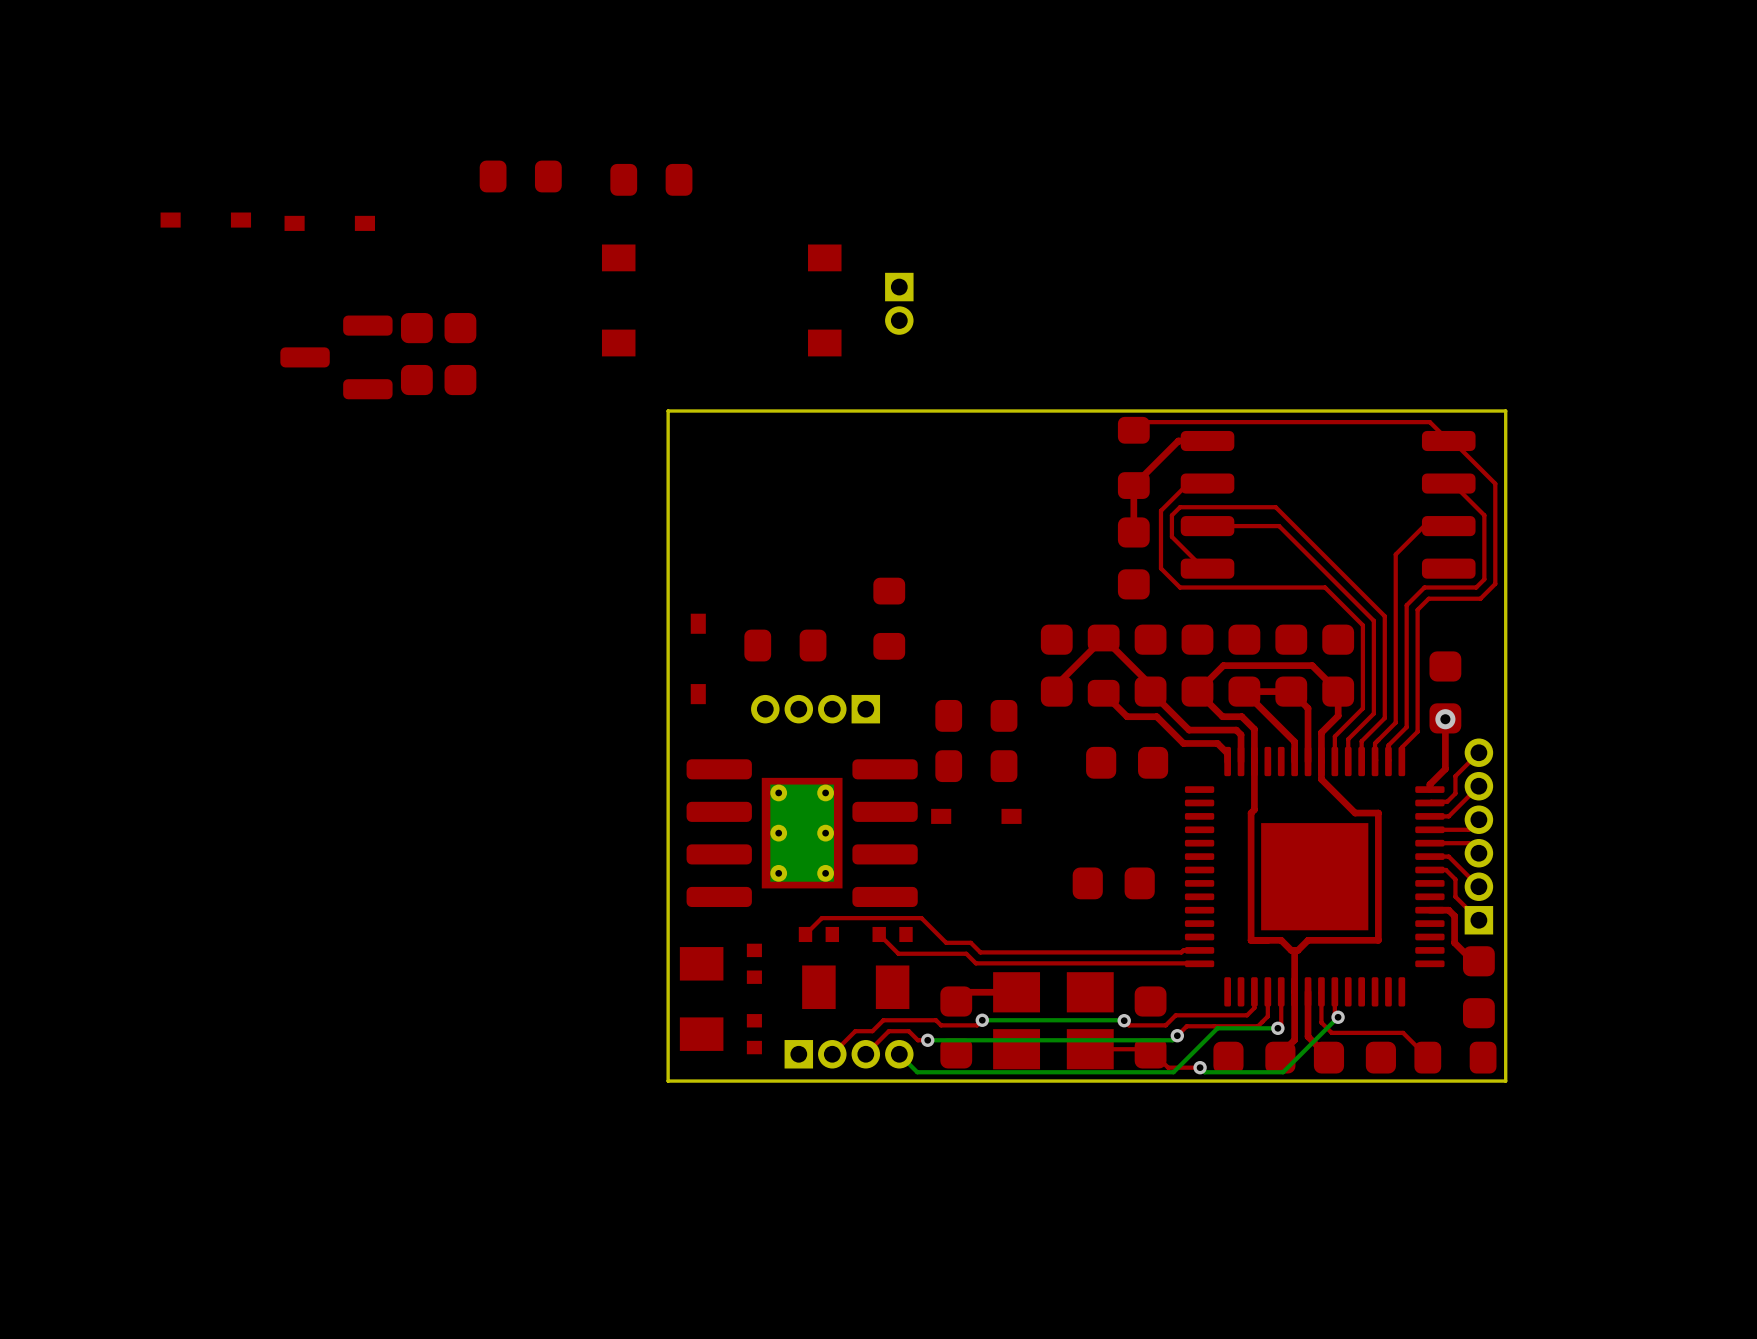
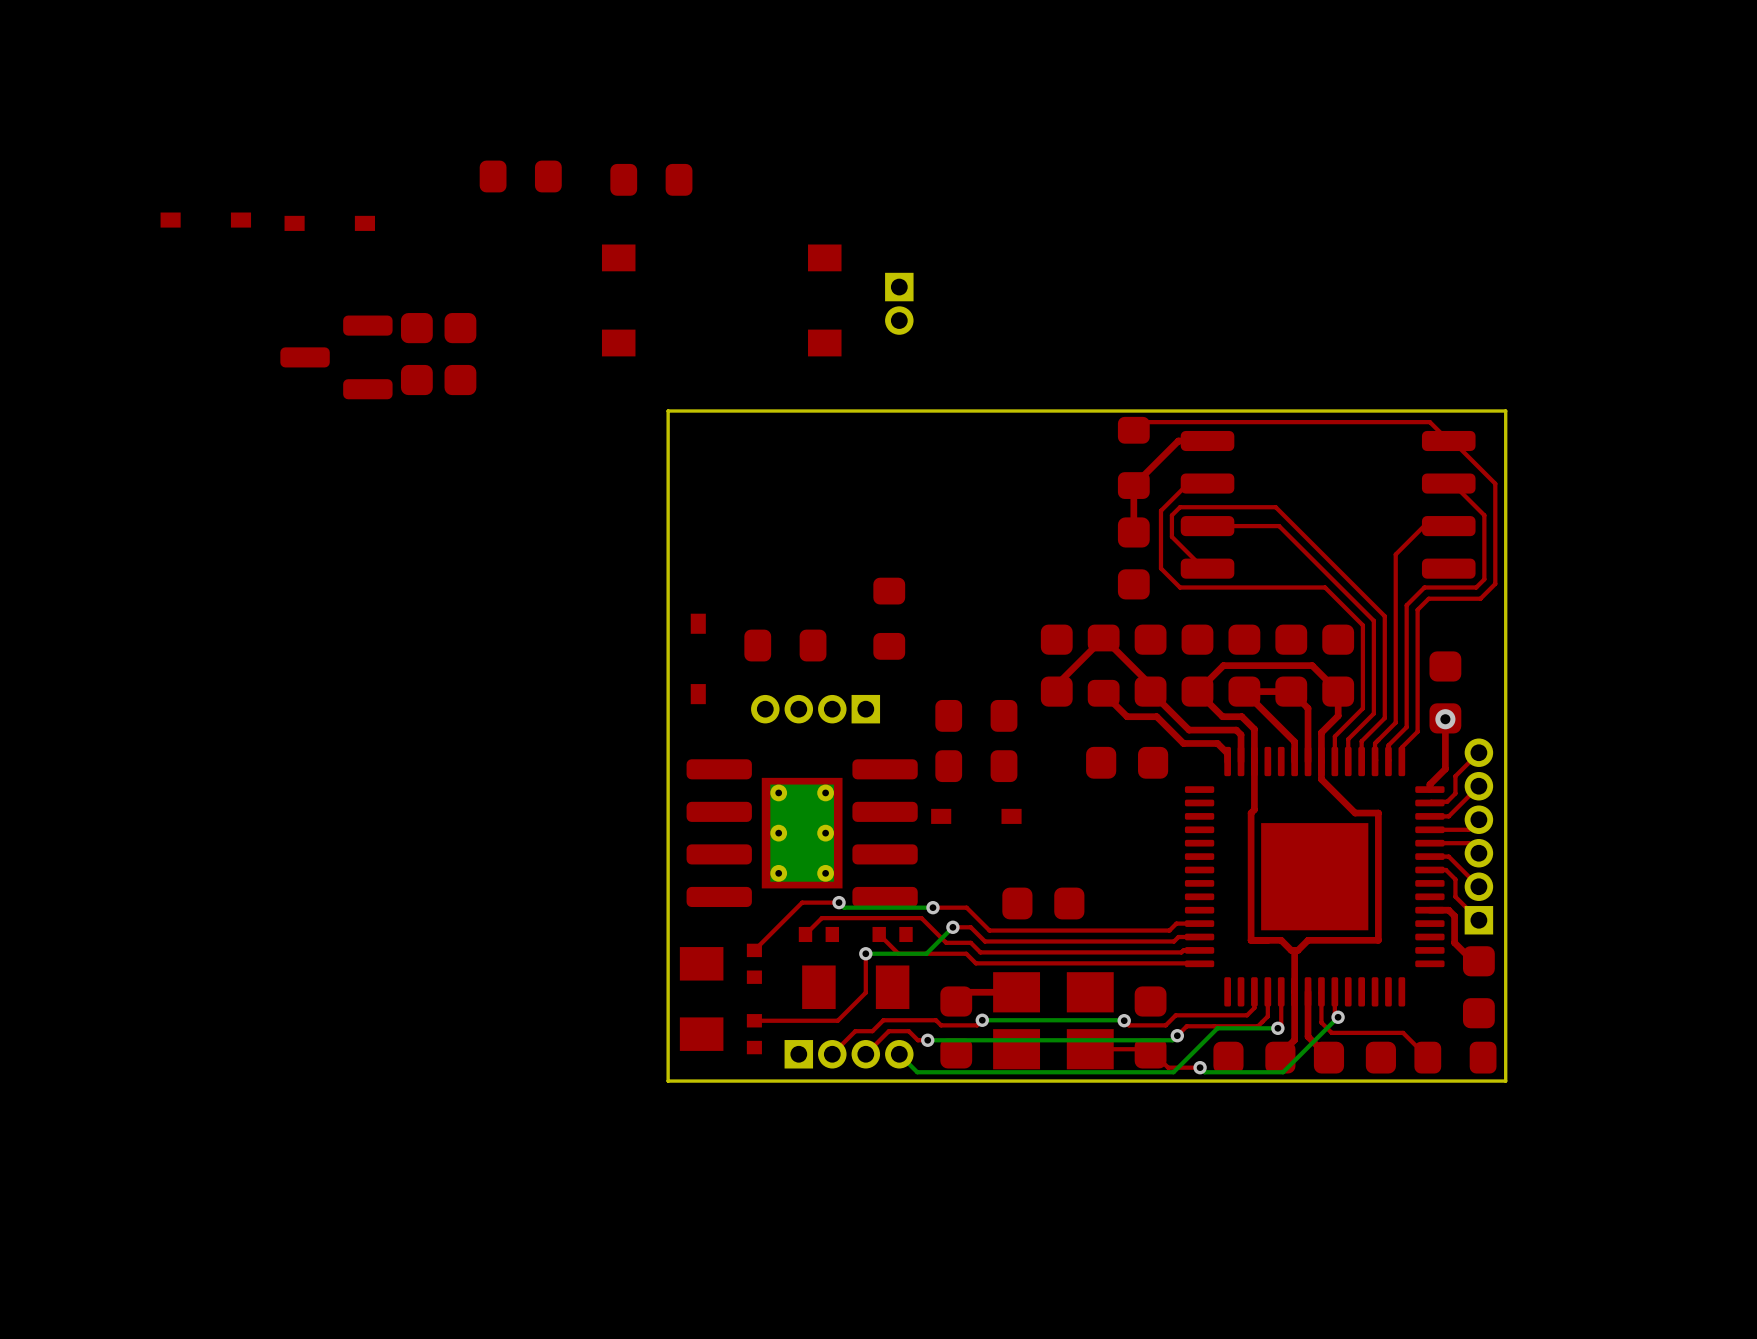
part position: (1113, 883) -> (1043, 903)
top track: none -> (839, 902) (802, 902) (754, 950)
bottom track: none -> (839, 902) (844, 907) (932, 907)
via: none -> (839, 902)
top track: none -> (932, 907) (966, 907) (989, 930) (1169, 930) (1176, 923) (1199, 923)
via: none -> (932, 907)
top track: none -> (952, 927) (970, 927) (984, 941) (1174, 941) (1178, 937) (1199, 937)
bottom track: none -> (952, 927) (926, 953) (865, 953)
via: none -> (952, 927)
top track: none -> (865, 953) (865, 992) (837, 1020) (754, 1020)
via: none -> (865, 953)

